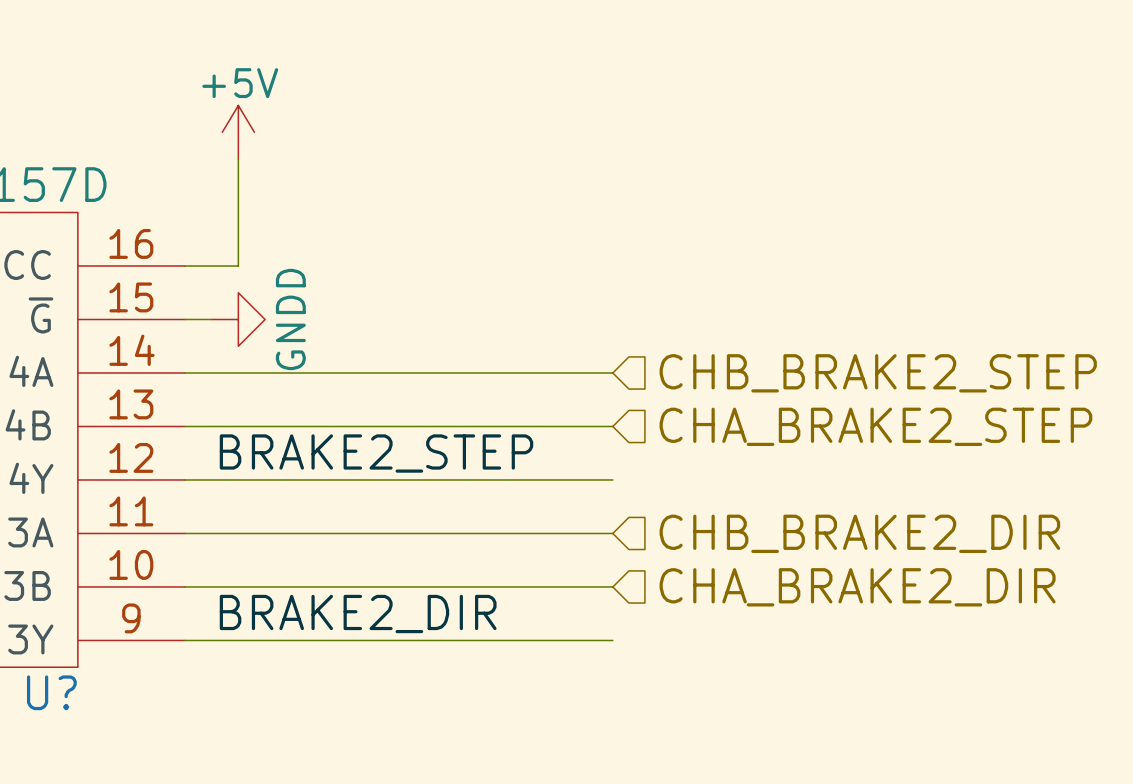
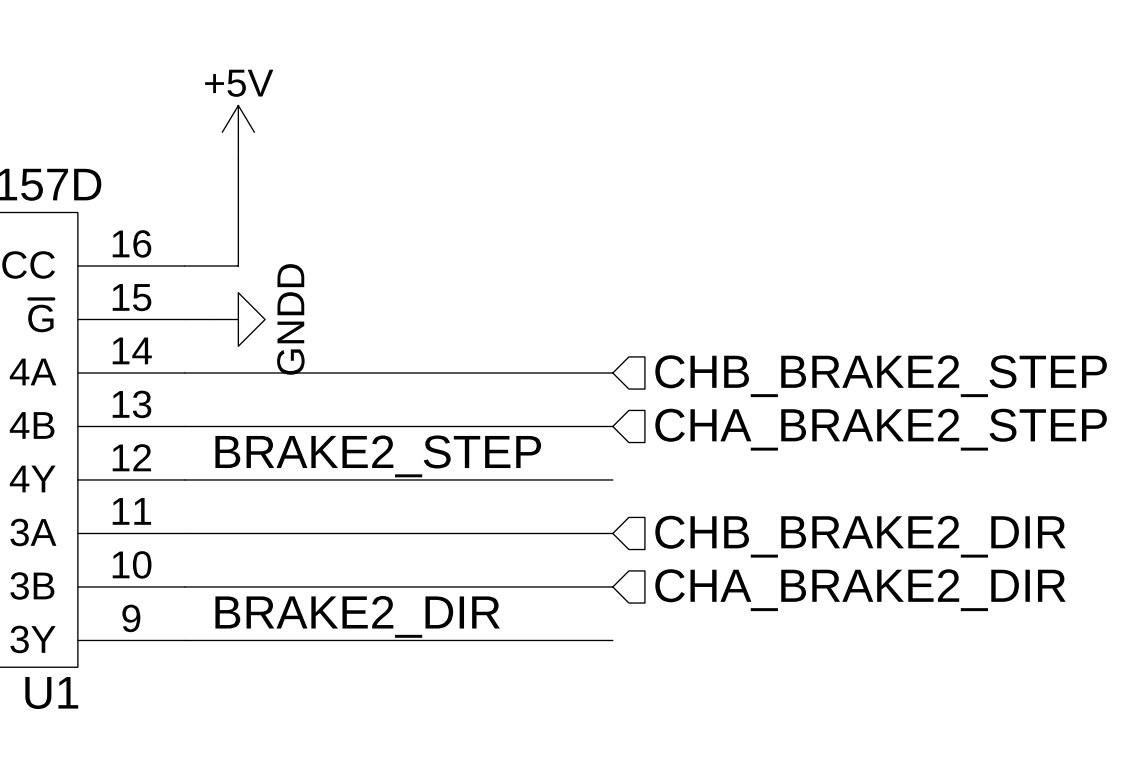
U? name: U? (51, 692) -> U1 (51, 693)

